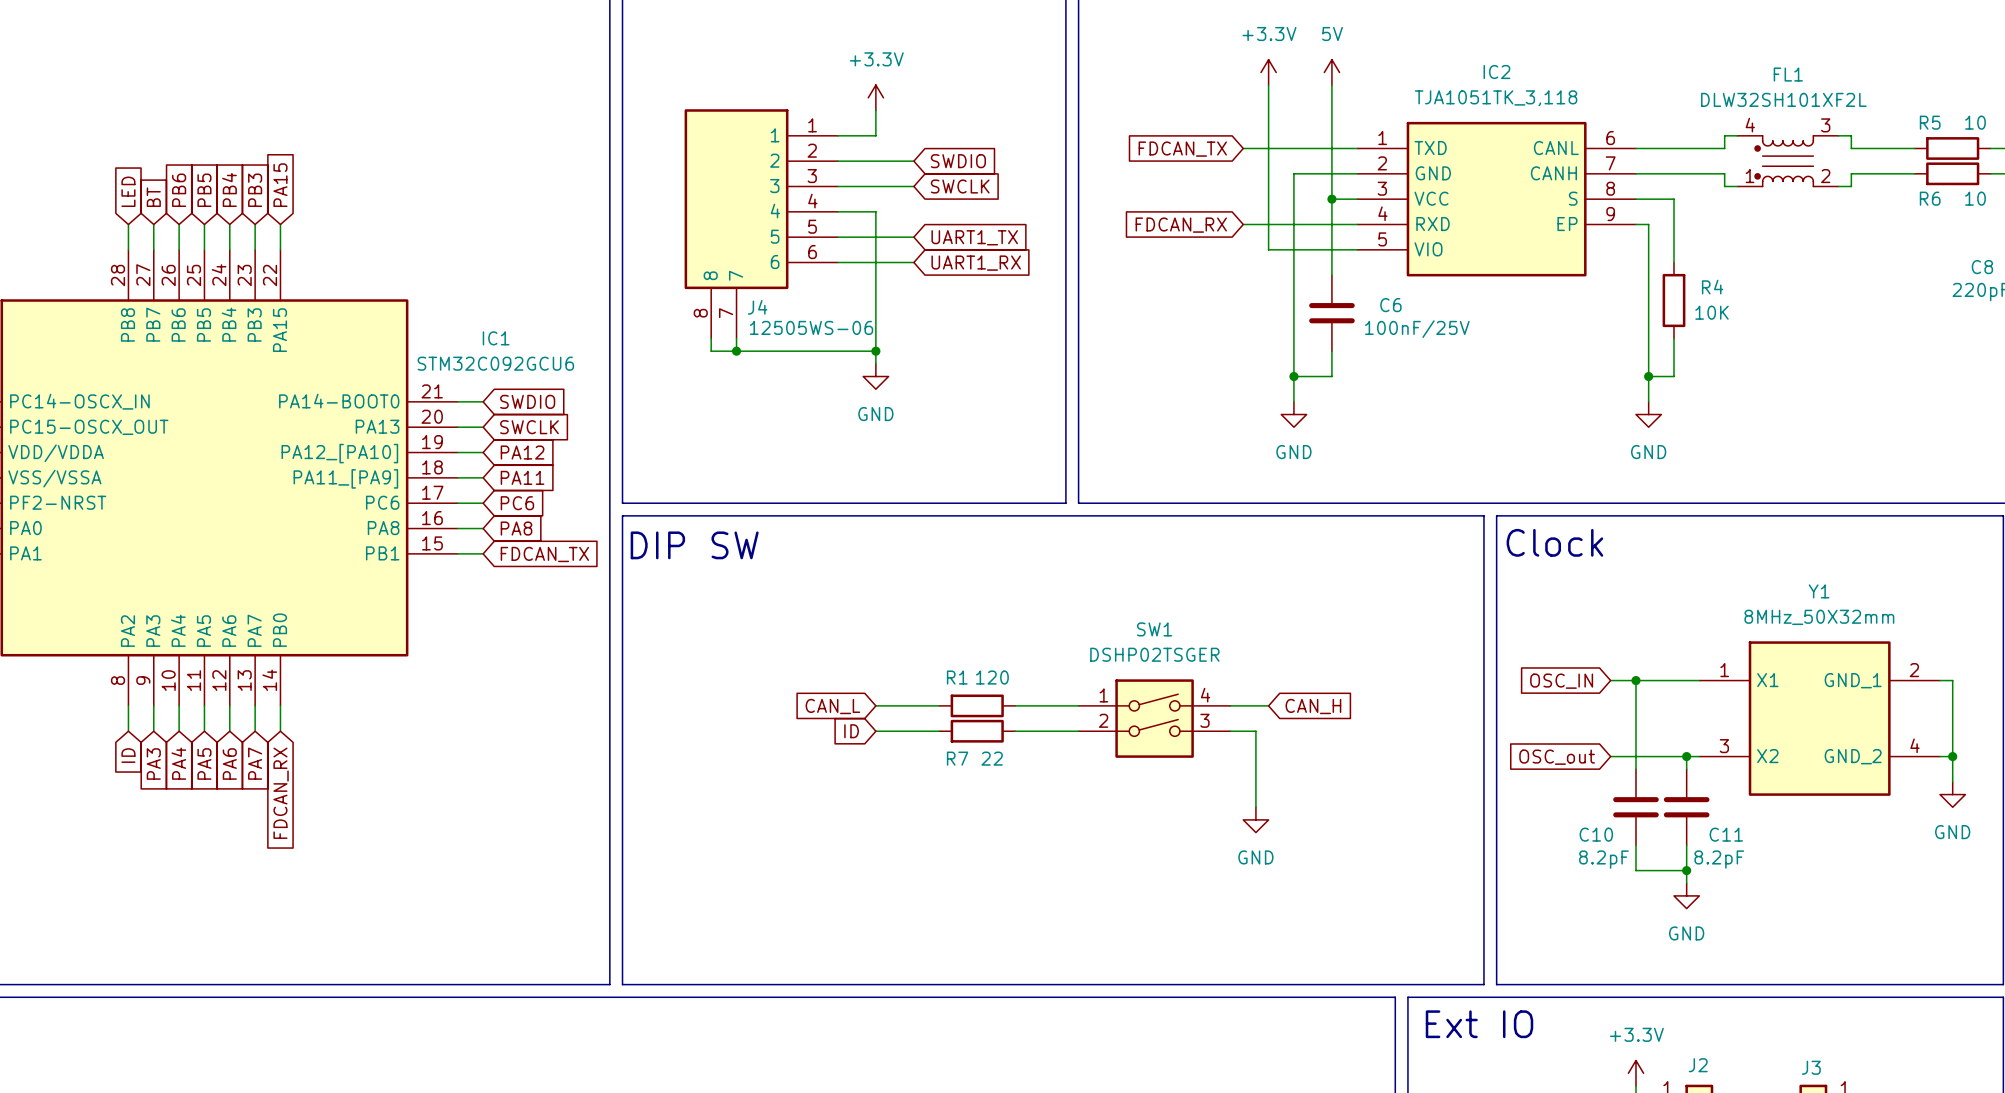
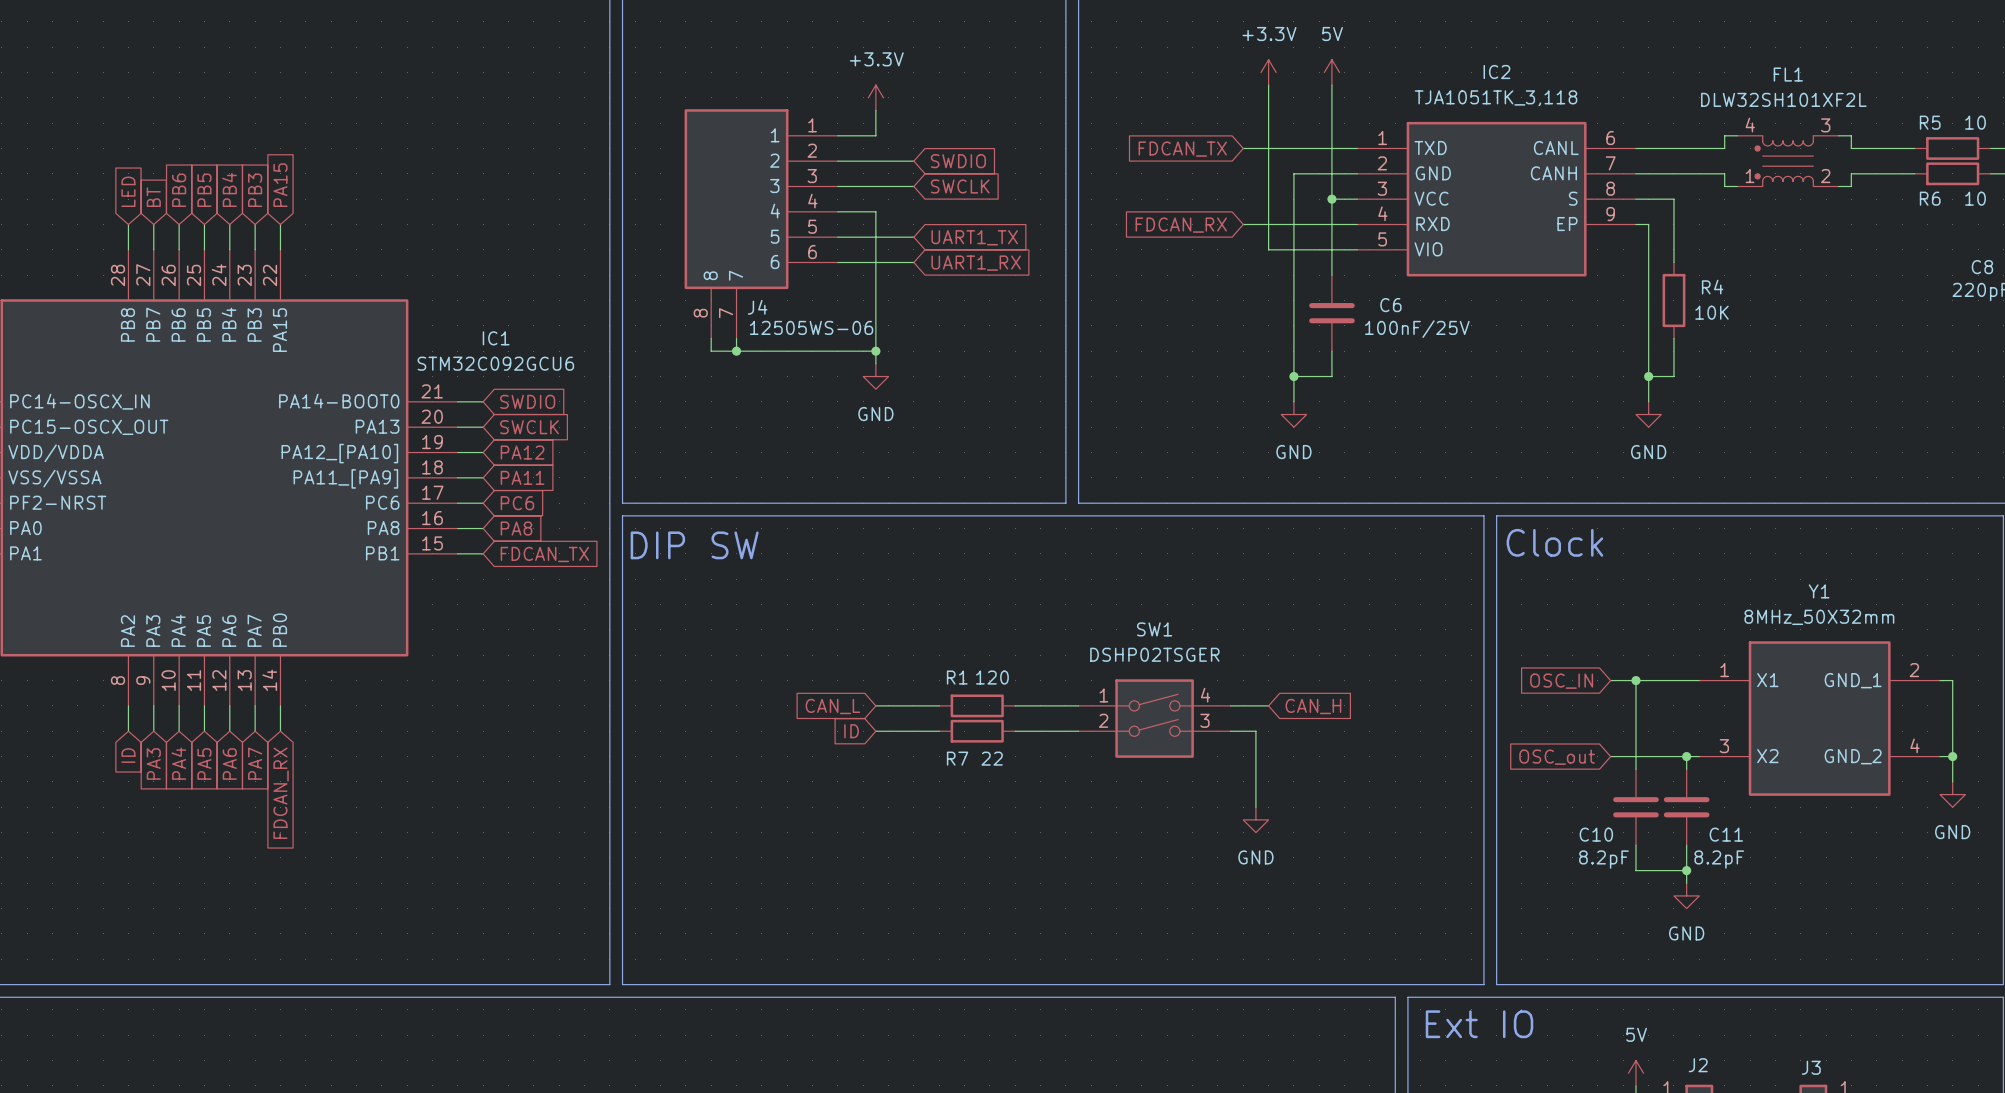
power symbol: +3.3V (1635, 1073) -> 5V (1635, 1073)

